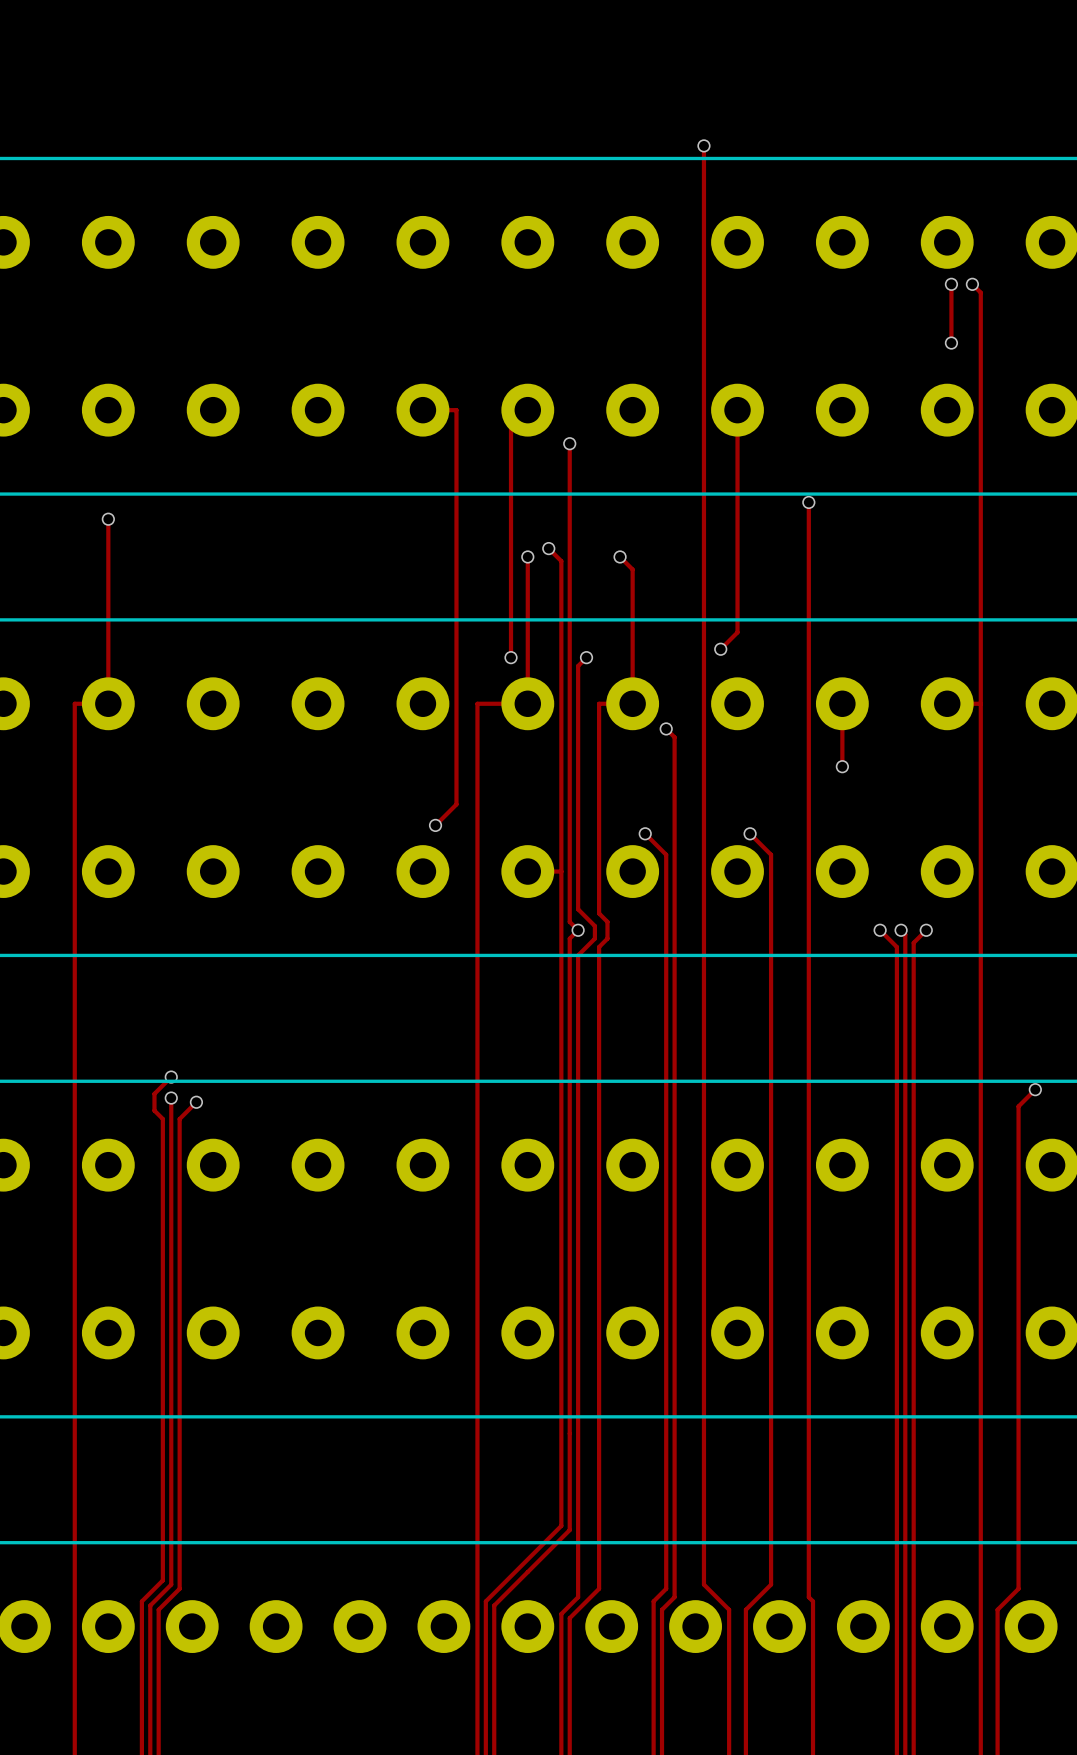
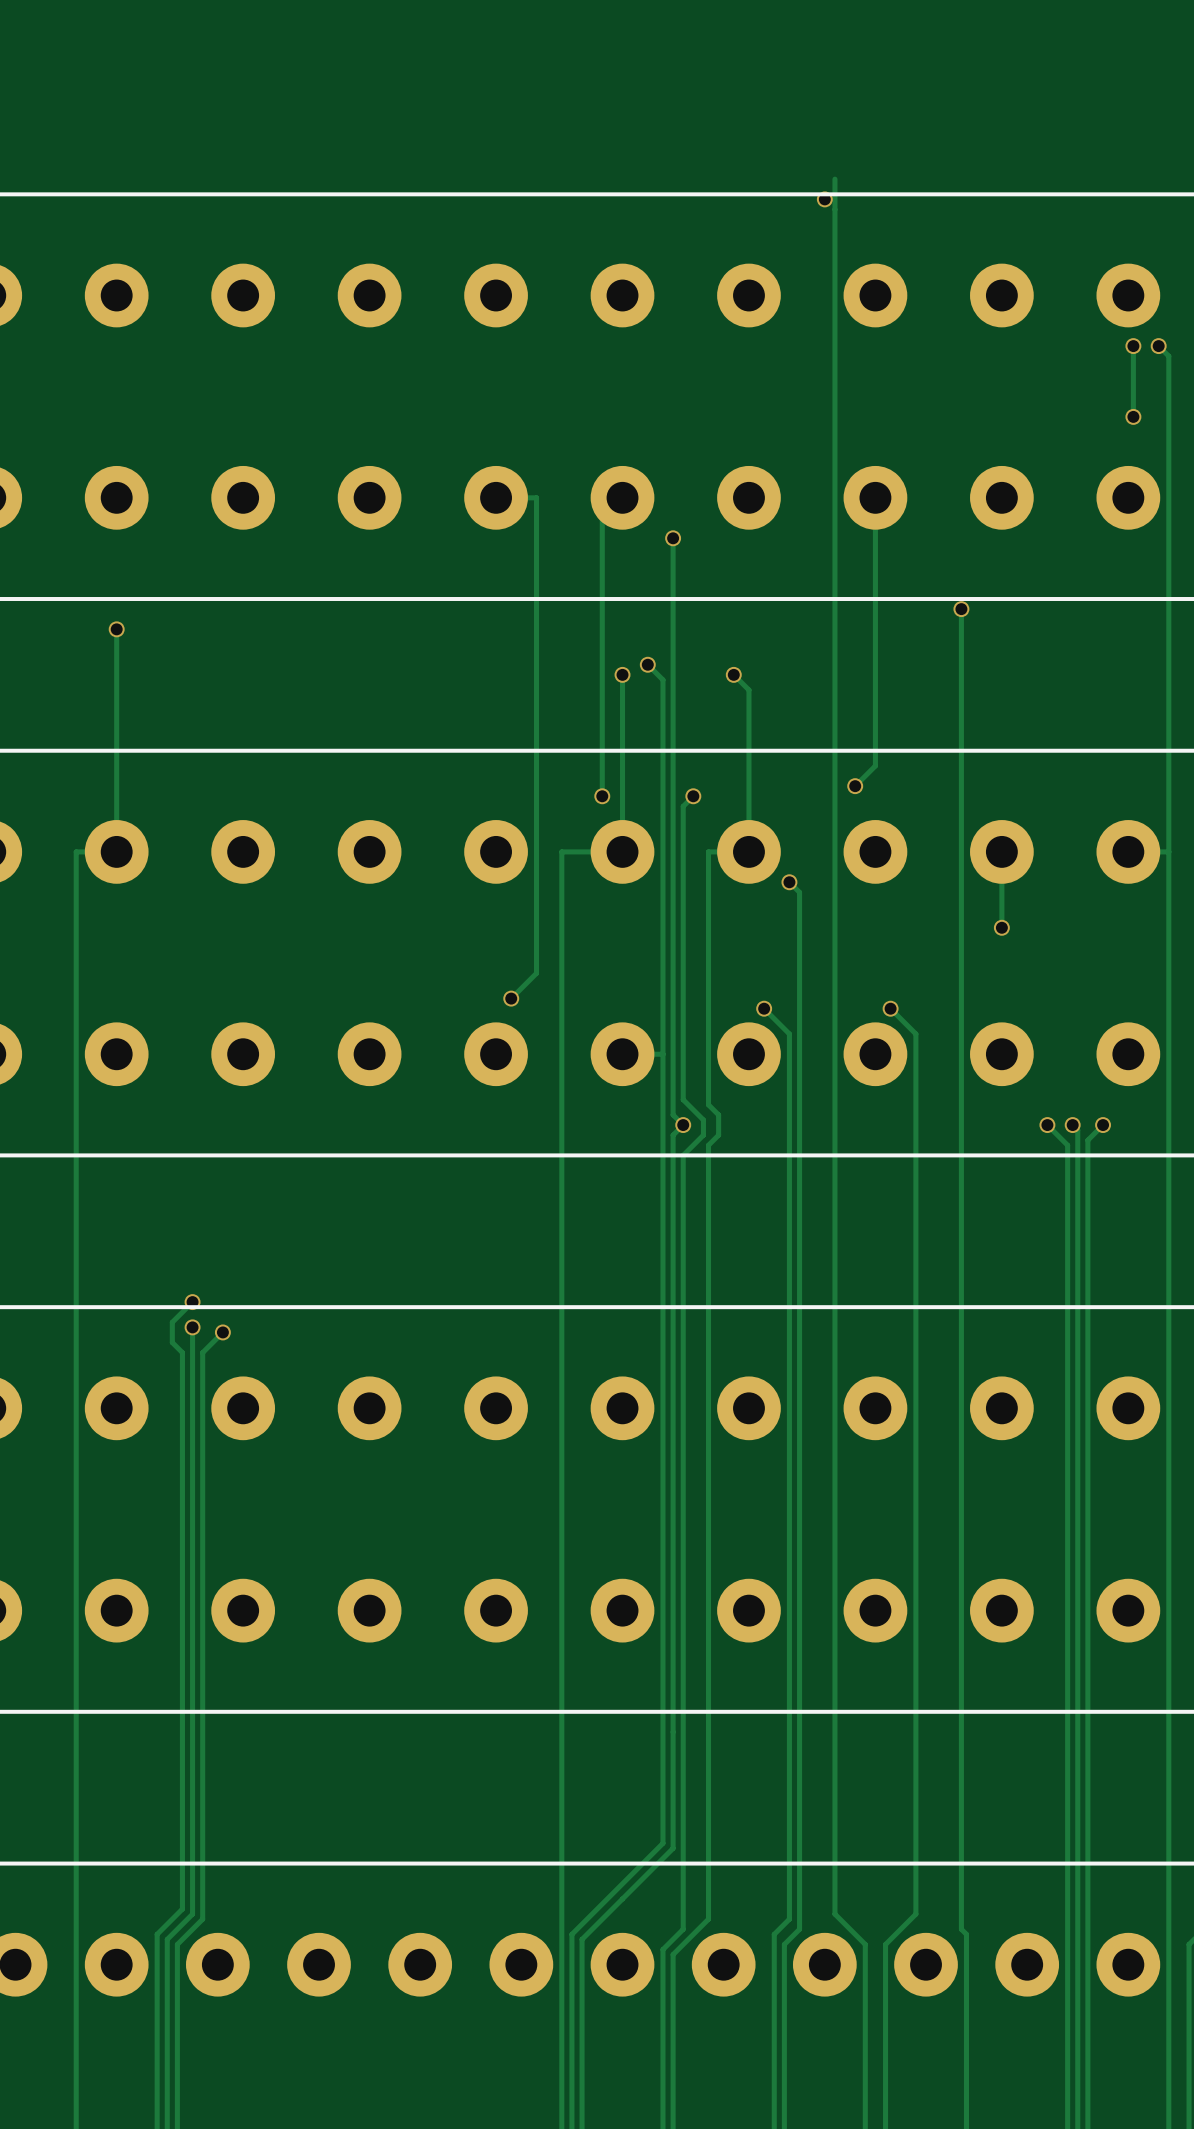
via position: (703, 145) -> (824, 199)

